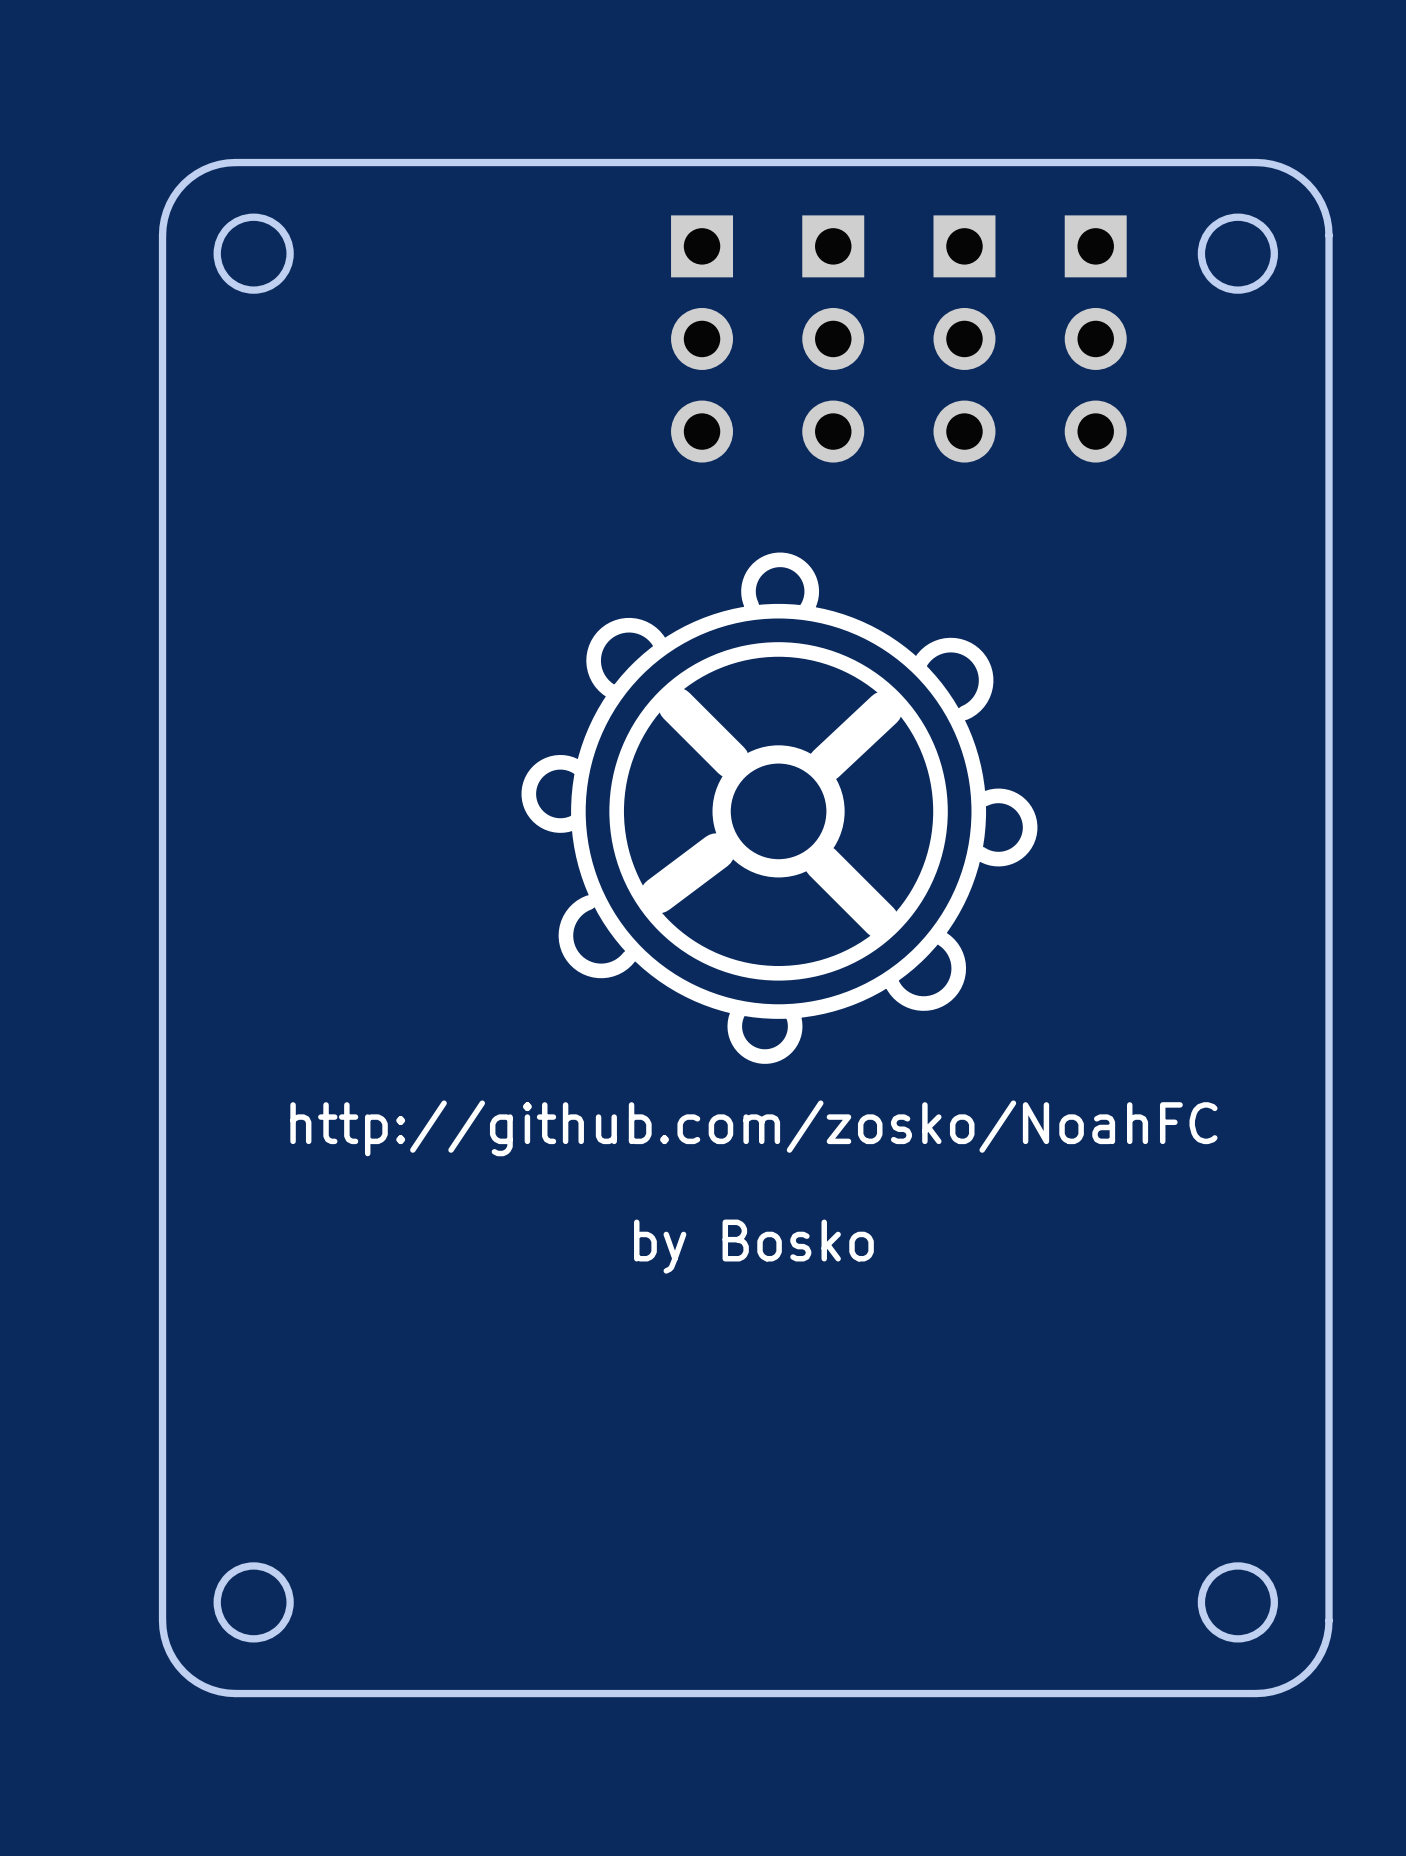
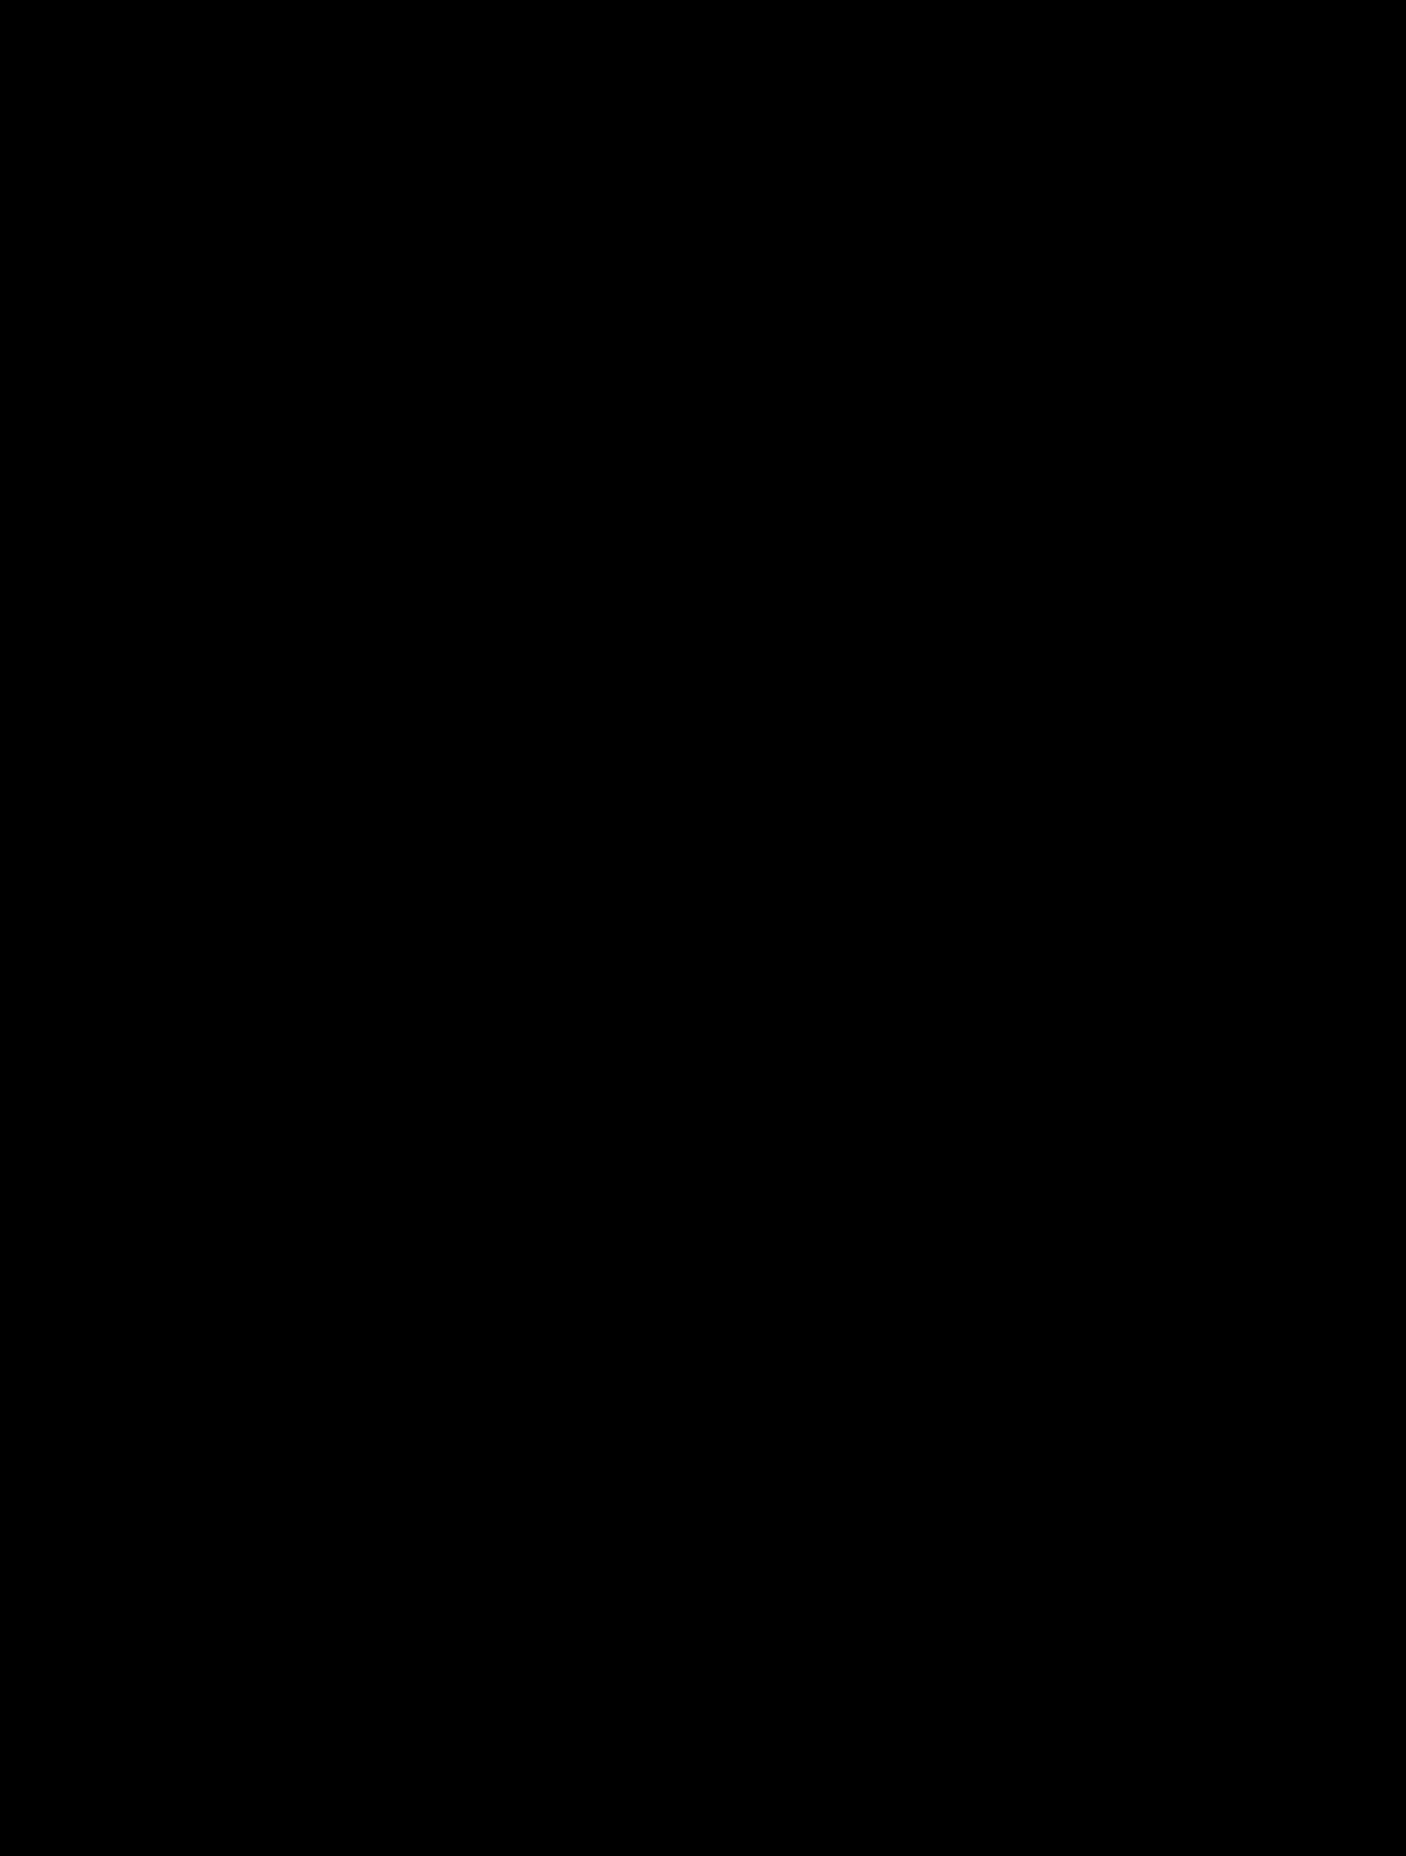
board edge: (1256, 162) (235, 162) (219, 164) (196, 173) (183, 183) (173, 196) (166, 211) (162, 235) (162, 1620) (166, 1644) (173, 1659) (183, 1672) (196, 1682) (211, 1689) (235, 1693) (1256, 1693) (1280, 1689) (1294, 1682) (1307, 1672) (1317, 1659) (1327, 1636) (1329, 1620) (1329, 235) (1324, 211) (1317, 196) (1307, 183) (1287, 169) (1272, 164) (1256, 162) -> none
round board edge: [213, 213, 294, 294] -> none
round board edge: [1197, 213, 1278, 294] -> none
part: (702, 338) -> none
part: (833, 338) -> none
part: (964, 338) -> none
part: (1095, 338) -> none
drawing: [571, 603, 987, 1019] -> none
line: (751, 605) (748, 590) (752, 575) (767, 562) (782, 559) (796, 564) (807, 575) (811, 590) (806, 609) -> none
line: (661, 647) (651, 633) (639, 626) (621, 625) (605, 633) (595, 648) (593, 665) (600, 682) (610, 691) -> none
line: (920, 661) (933, 649) (950, 645) (967, 649) (977, 657) (985, 673) (985, 686) (978, 702) (964, 712) -> none
line: (676, 705) (731, 760) -> none
line: (884, 709) (825, 763) -> none
line: (578, 767) (563, 762) (548, 764) (533, 777) (528, 791) (533, 810) (544, 821) (559, 825) (574, 822) -> none
line: (984, 799) (1003, 796) (1017, 802) (1027, 814) (1030, 829) (1025, 844) (1014, 855) (995, 859) (980, 853) -> none
line: (716, 851) (658, 895) -> none
line: (822, 862) (880, 920) -> none
line: (589, 902) (577, 909) (568, 923) (566, 940) (572, 956) (586, 967) (602, 970) (619, 965) (629, 957) -> none
line: (942, 938) (952, 947) (958, 963) (956, 981) (946, 995) (931, 1002) (918, 1003) (902, 996) (891, 982) -> none
line: (738, 1011) (734, 1026) (738, 1040) (748, 1051) (762, 1056) (777, 1053) (789, 1044) (794, 1030) (793, 1015) -> none
text: http://github.com/zosko/NoahFC (753, 1128) -> none
text: by Bosko (753, 1246) -> none
round board edge: [213, 1562, 294, 1643] -> none
round board edge: [1197, 1562, 1278, 1643] -> none

